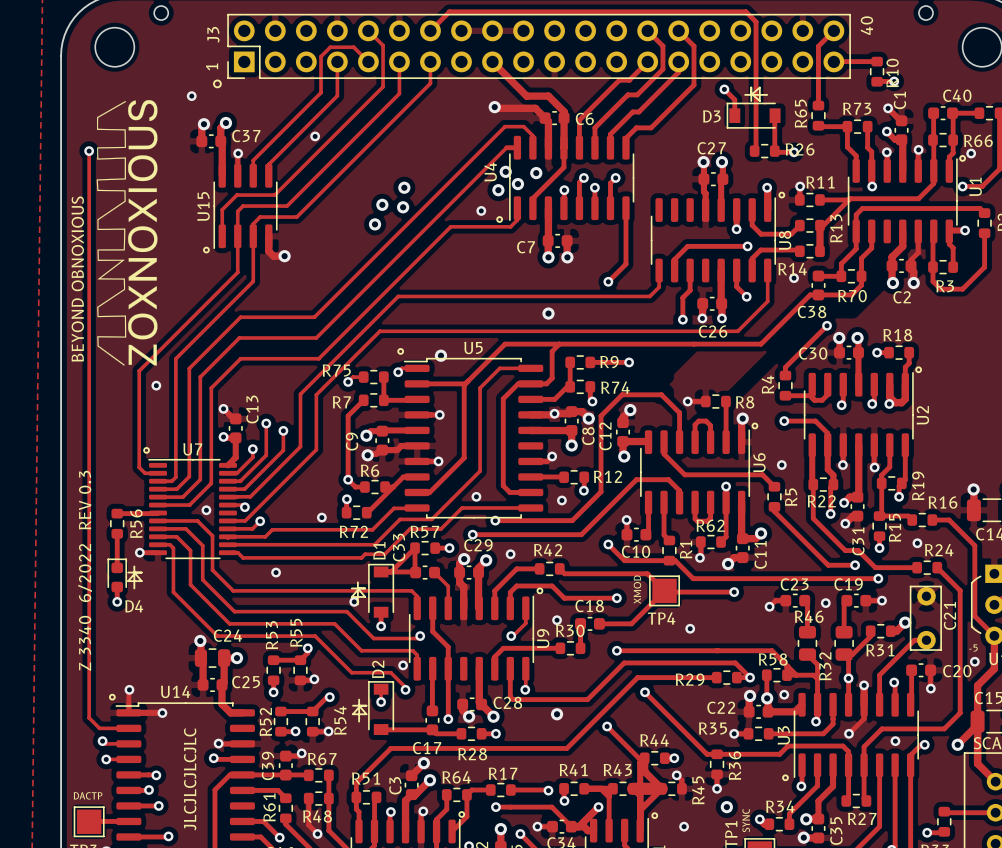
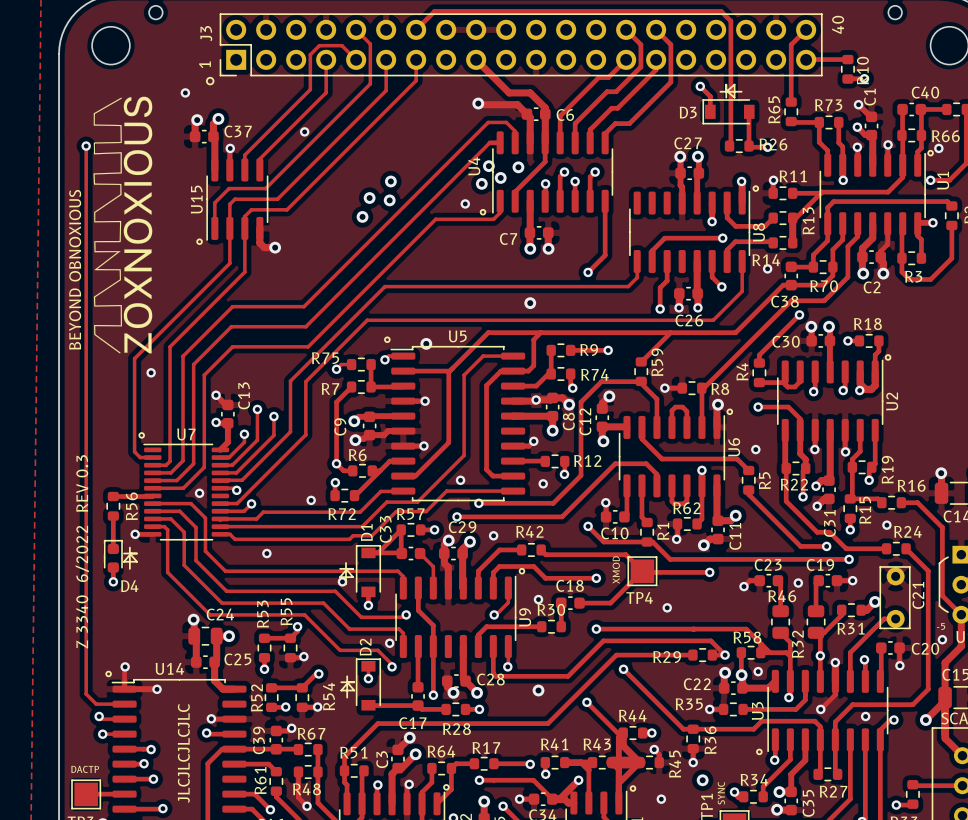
track: none -> (857, 223) (857, 236) (847, 246) (847, 277) (824, 300) (791, 300) (701, 388)
track: none -> (670, 332) (641, 361)
R59: none -> (641, 371)

